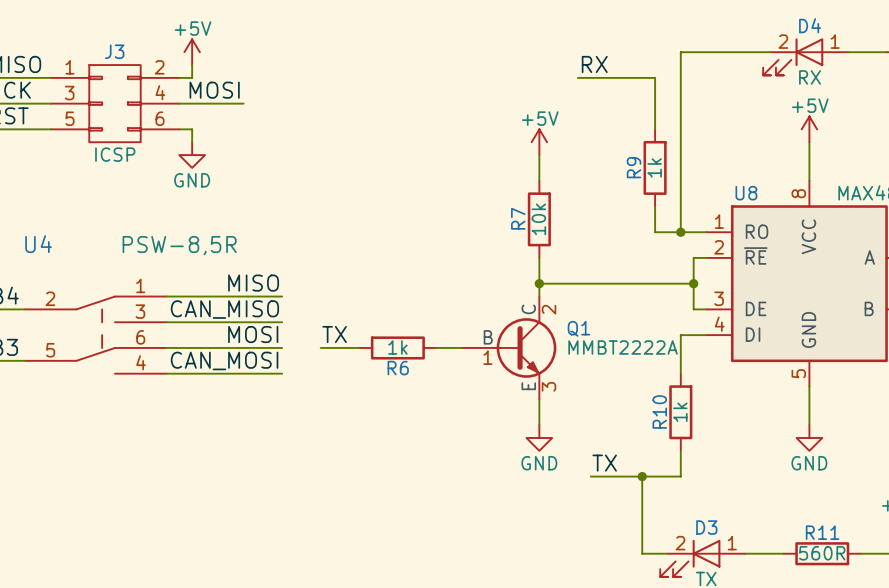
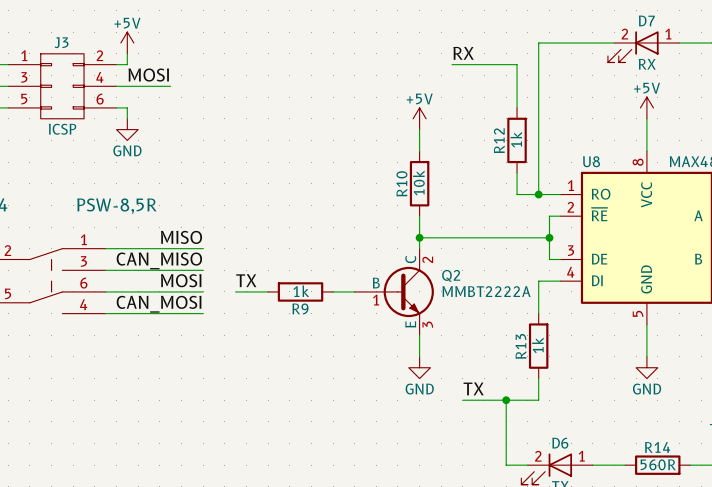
D4 name: D4 (810, 25) -> D7 (646, 20)
R9 name: R9 (634, 167) -> R12 (499, 140)
R7 name: R7 (518, 218) -> R10 (401, 183)
Q1 name: Q1 (578, 328) -> Q2 (451, 275)
R6 name: R6 (398, 368) -> R9 (300, 308)
R10 name: R10 (659, 411) -> R13 (520, 346)
D3 name: D3 (706, 527) -> D6 (560, 443)
R11 name: R11 (822, 532) -> R14 (657, 447)

